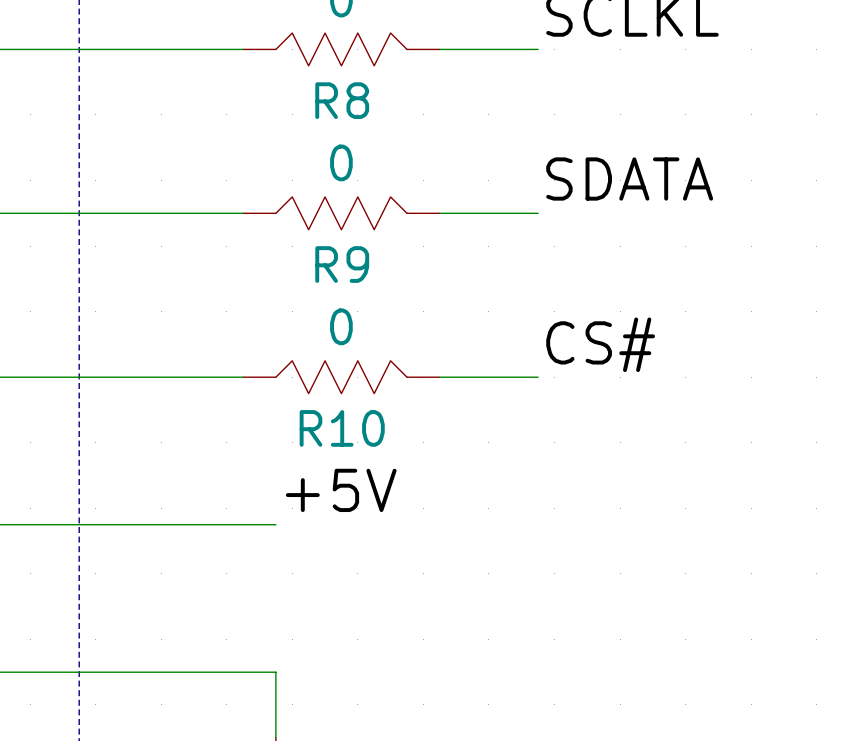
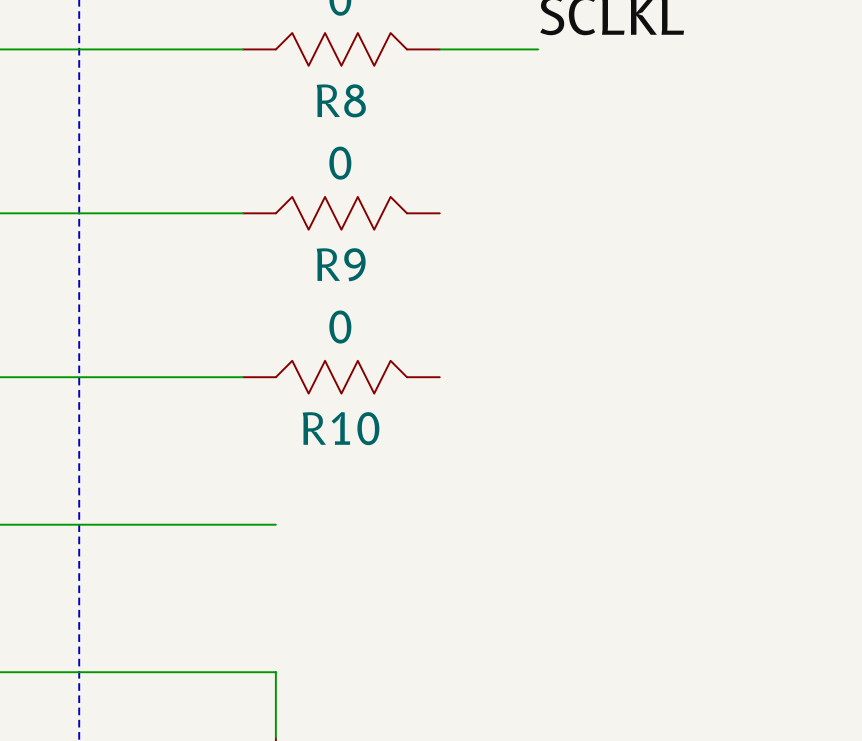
label: SDATA (629, 179) -> none
wire: (439, 213) (538, 213) -> none
label: CS# (600, 344) -> none
wire: (439, 377) (538, 377) -> none
label: +5V (341, 490) -> none

